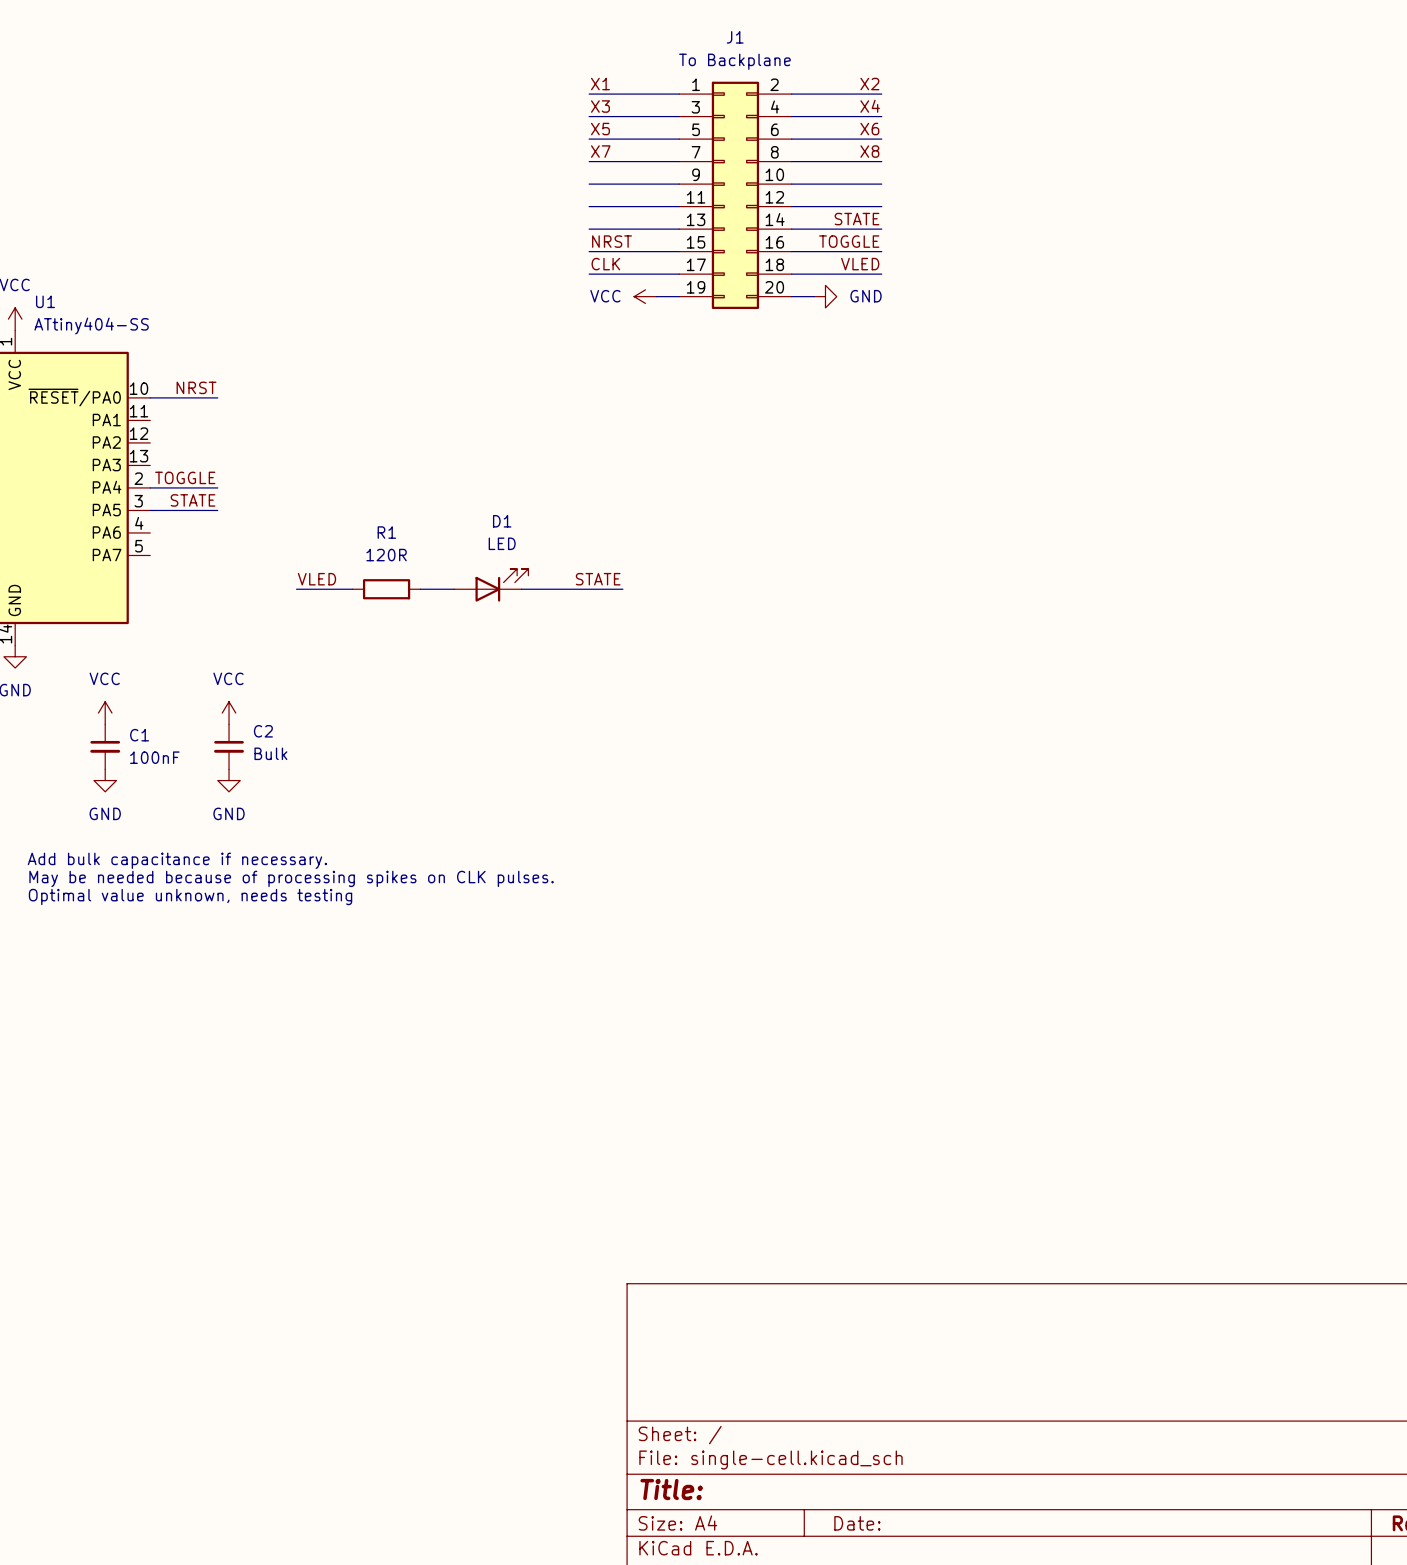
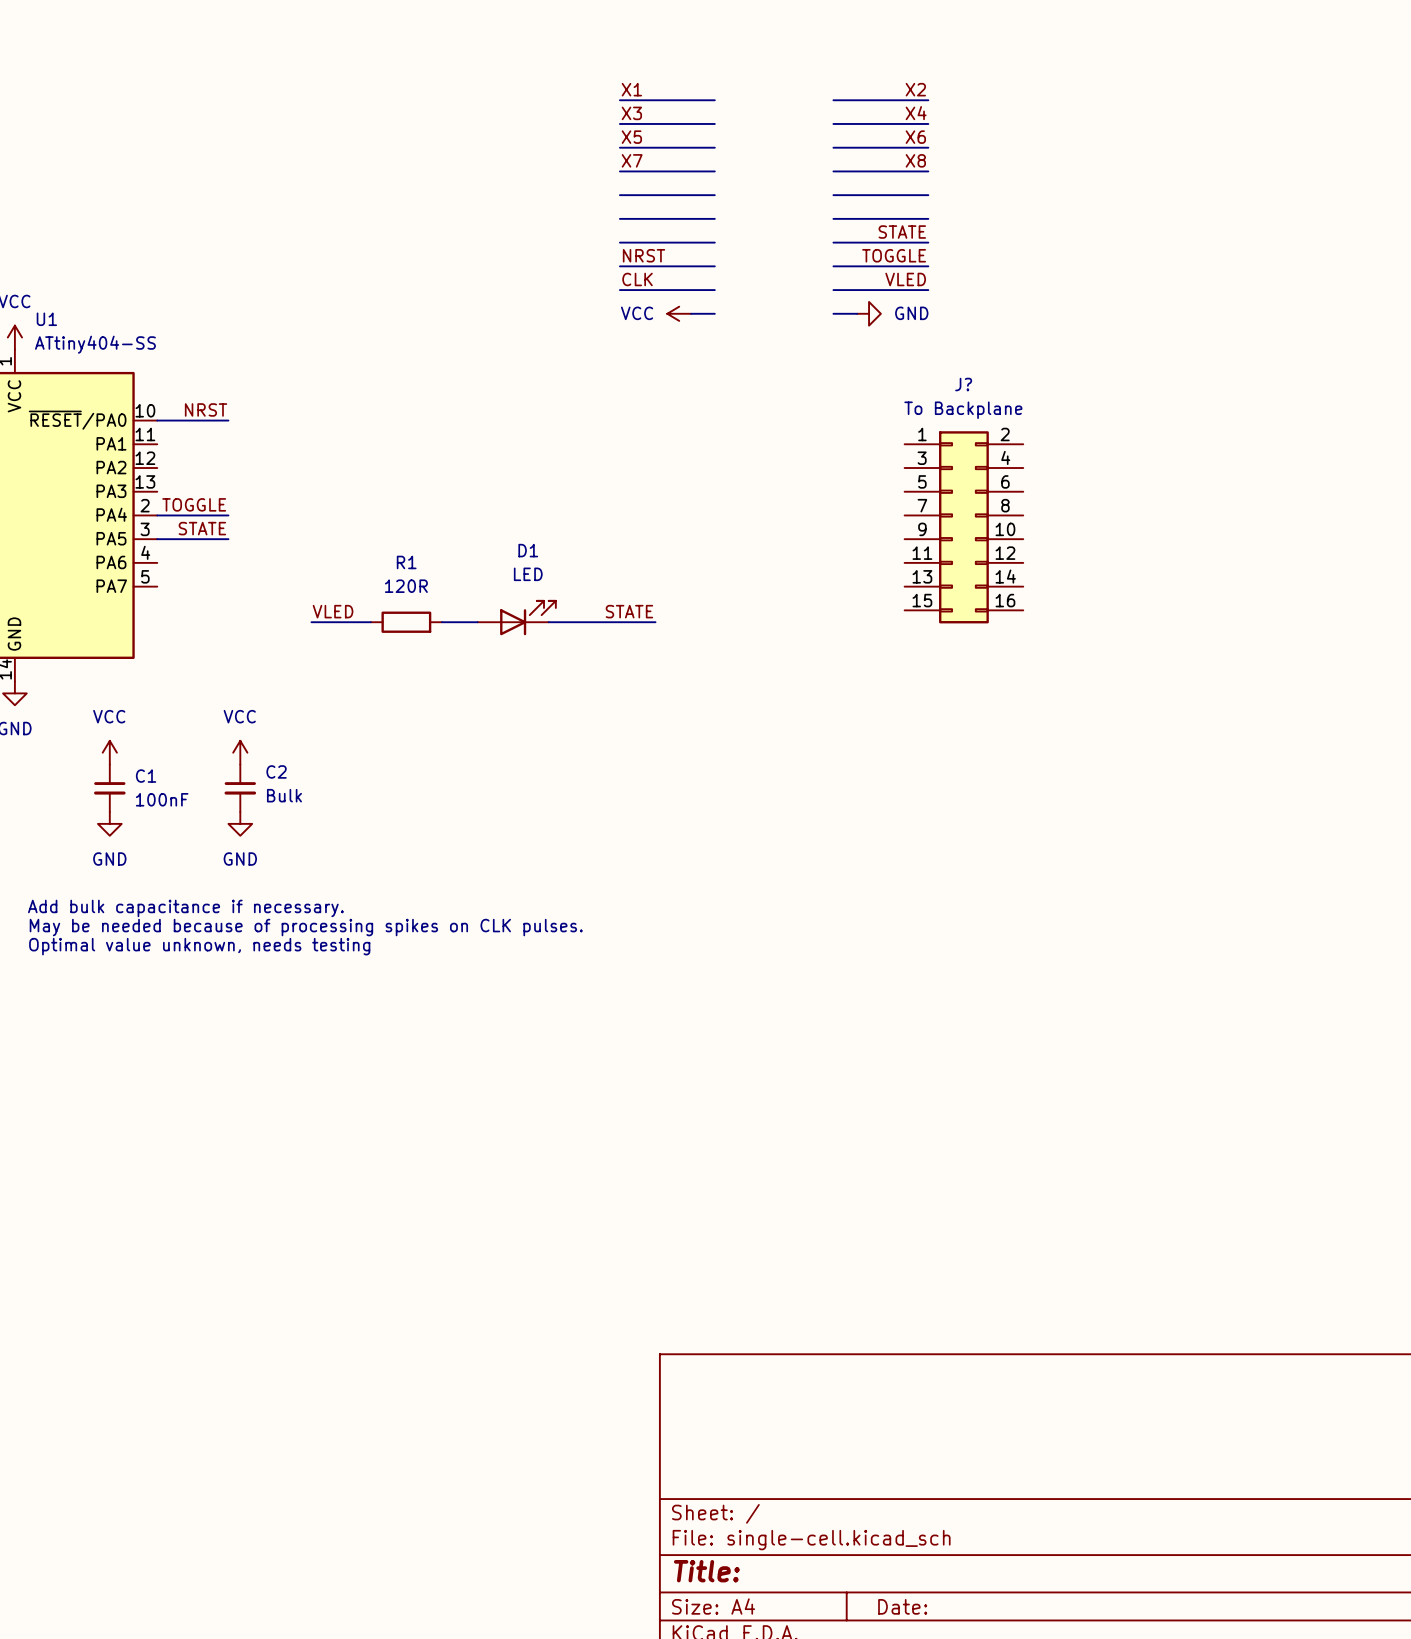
J1: To Backplane (735, 195) -> none
J?: none -> To Backplane (963, 527)

